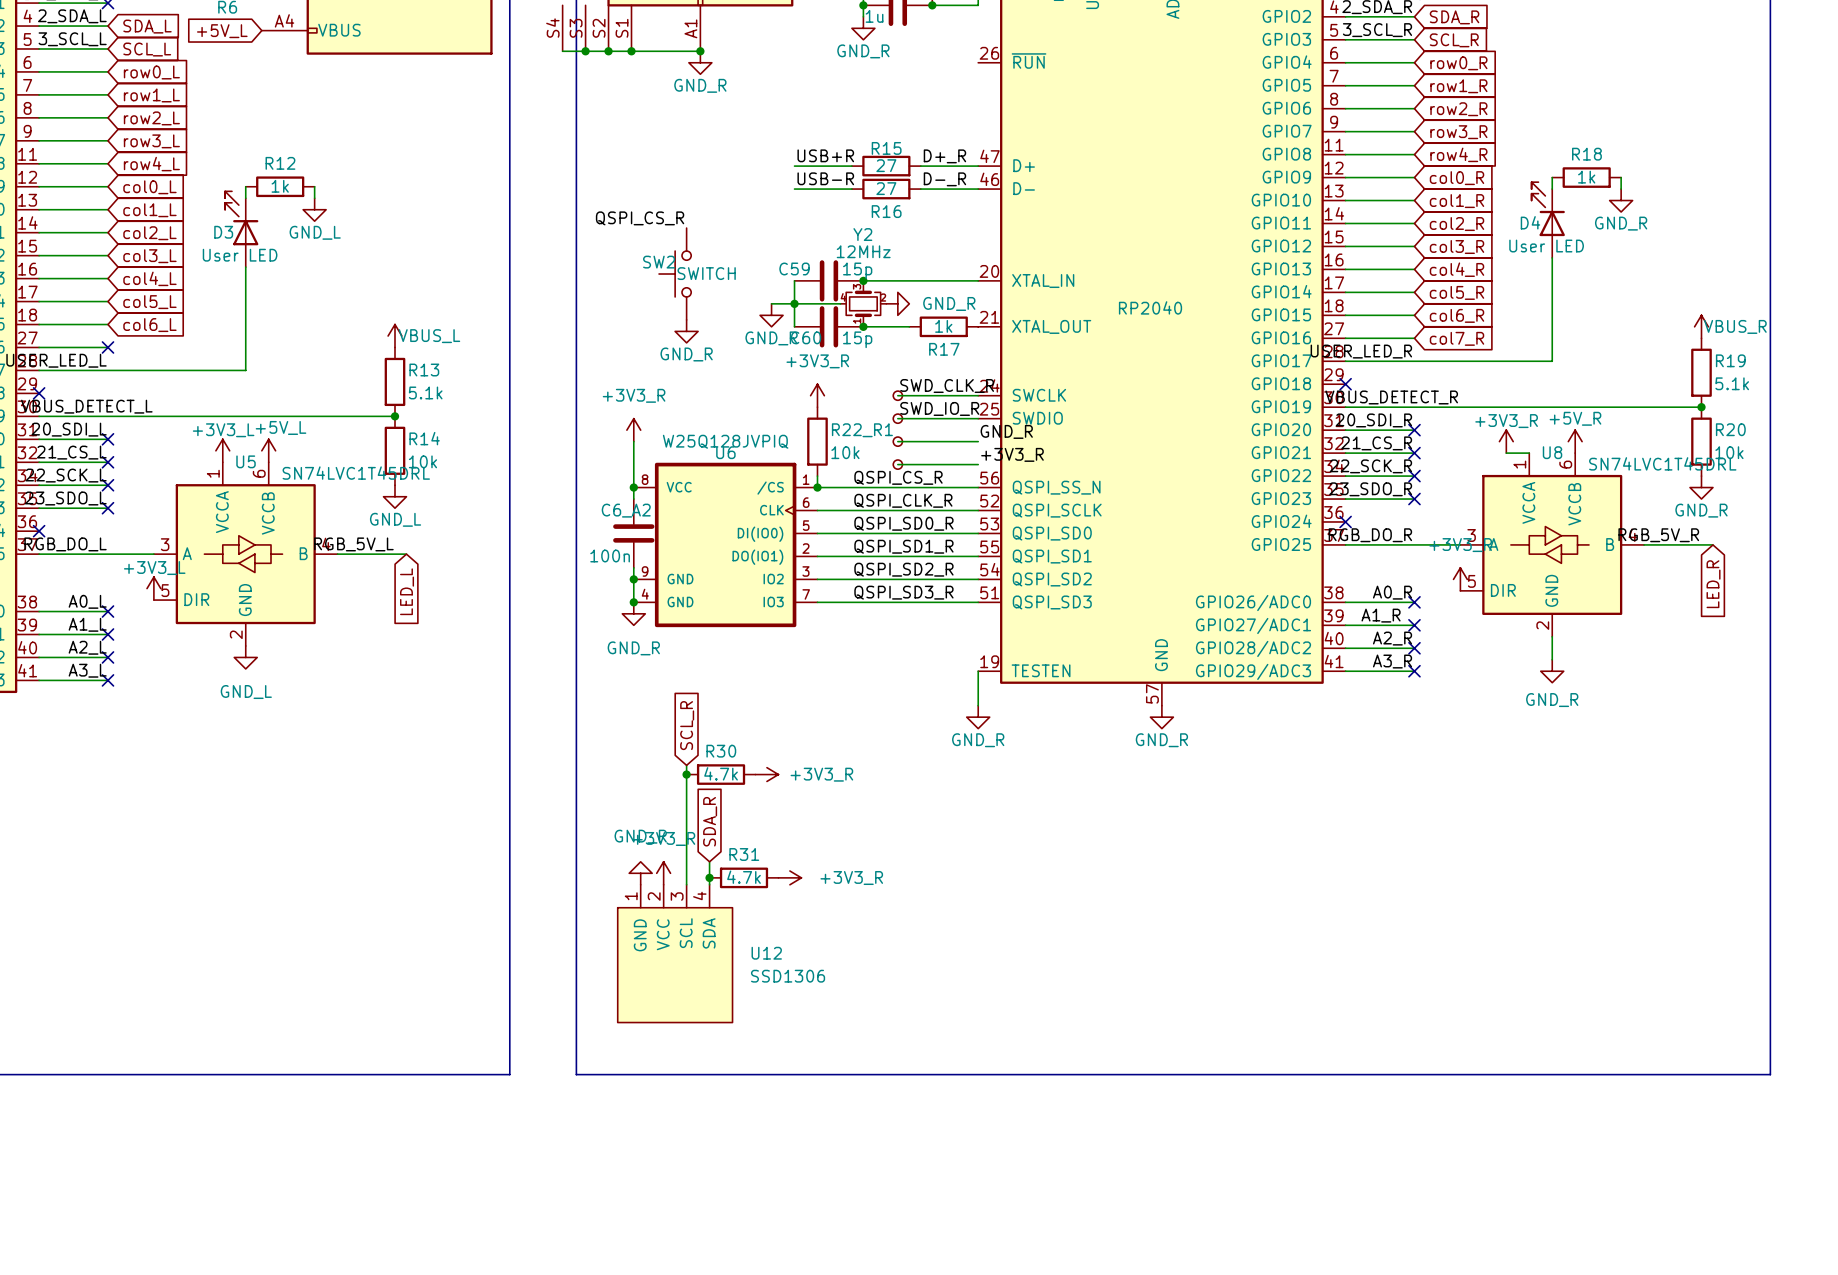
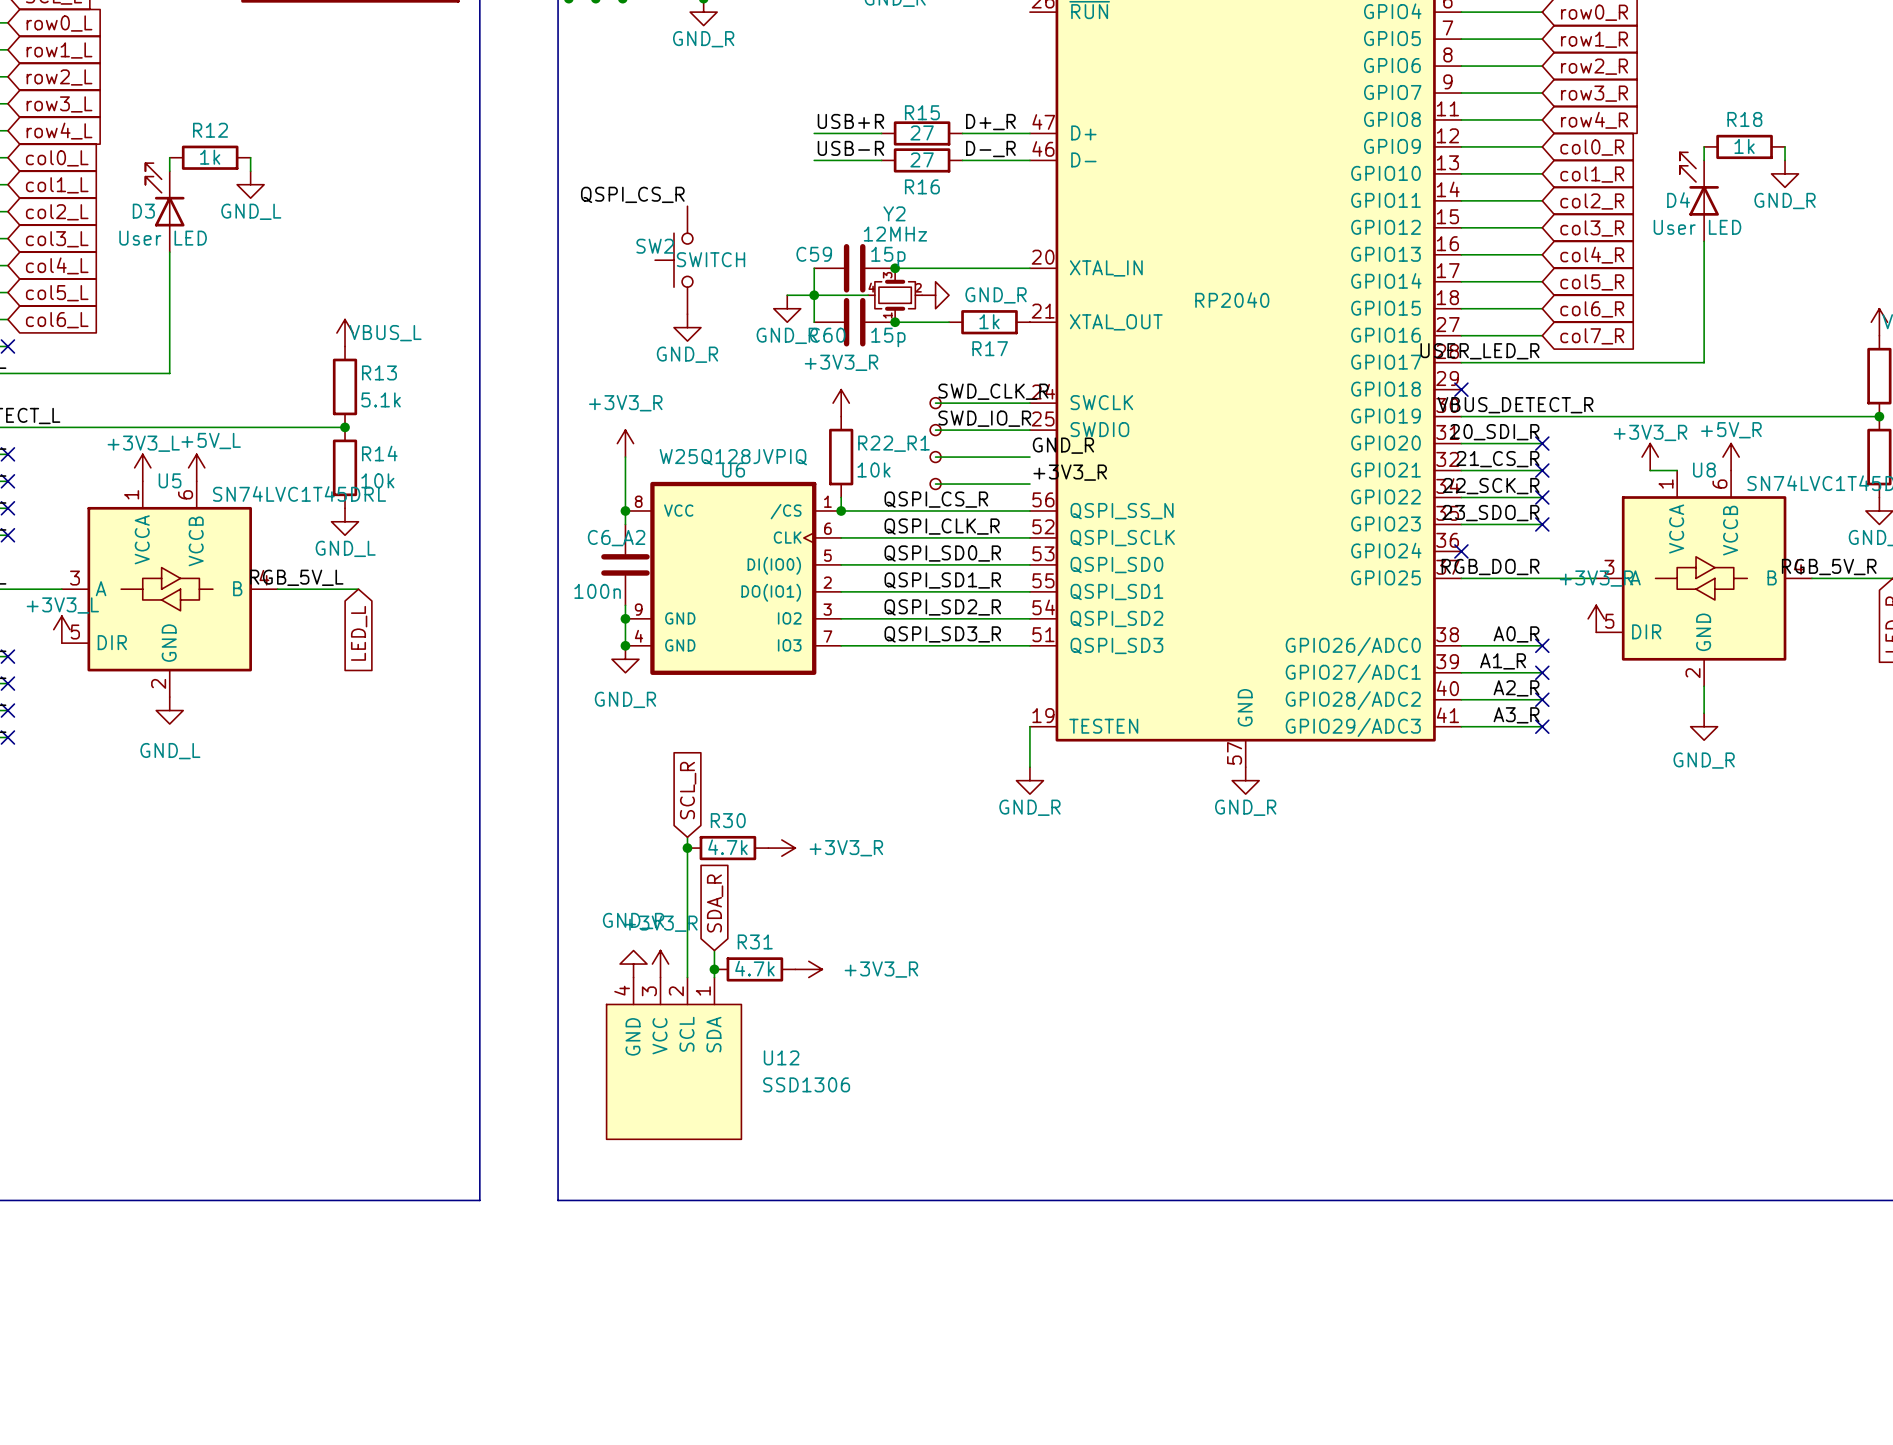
U12 pin number: 4 (699, 895) -> 1 (703, 990)
U12 pin number: 1 (631, 896) -> 4 (622, 990)
U12 pin number: 2 (654, 896) -> 3 (649, 991)
U12 pin number: 3 (677, 896) -> 2 (676, 991)

